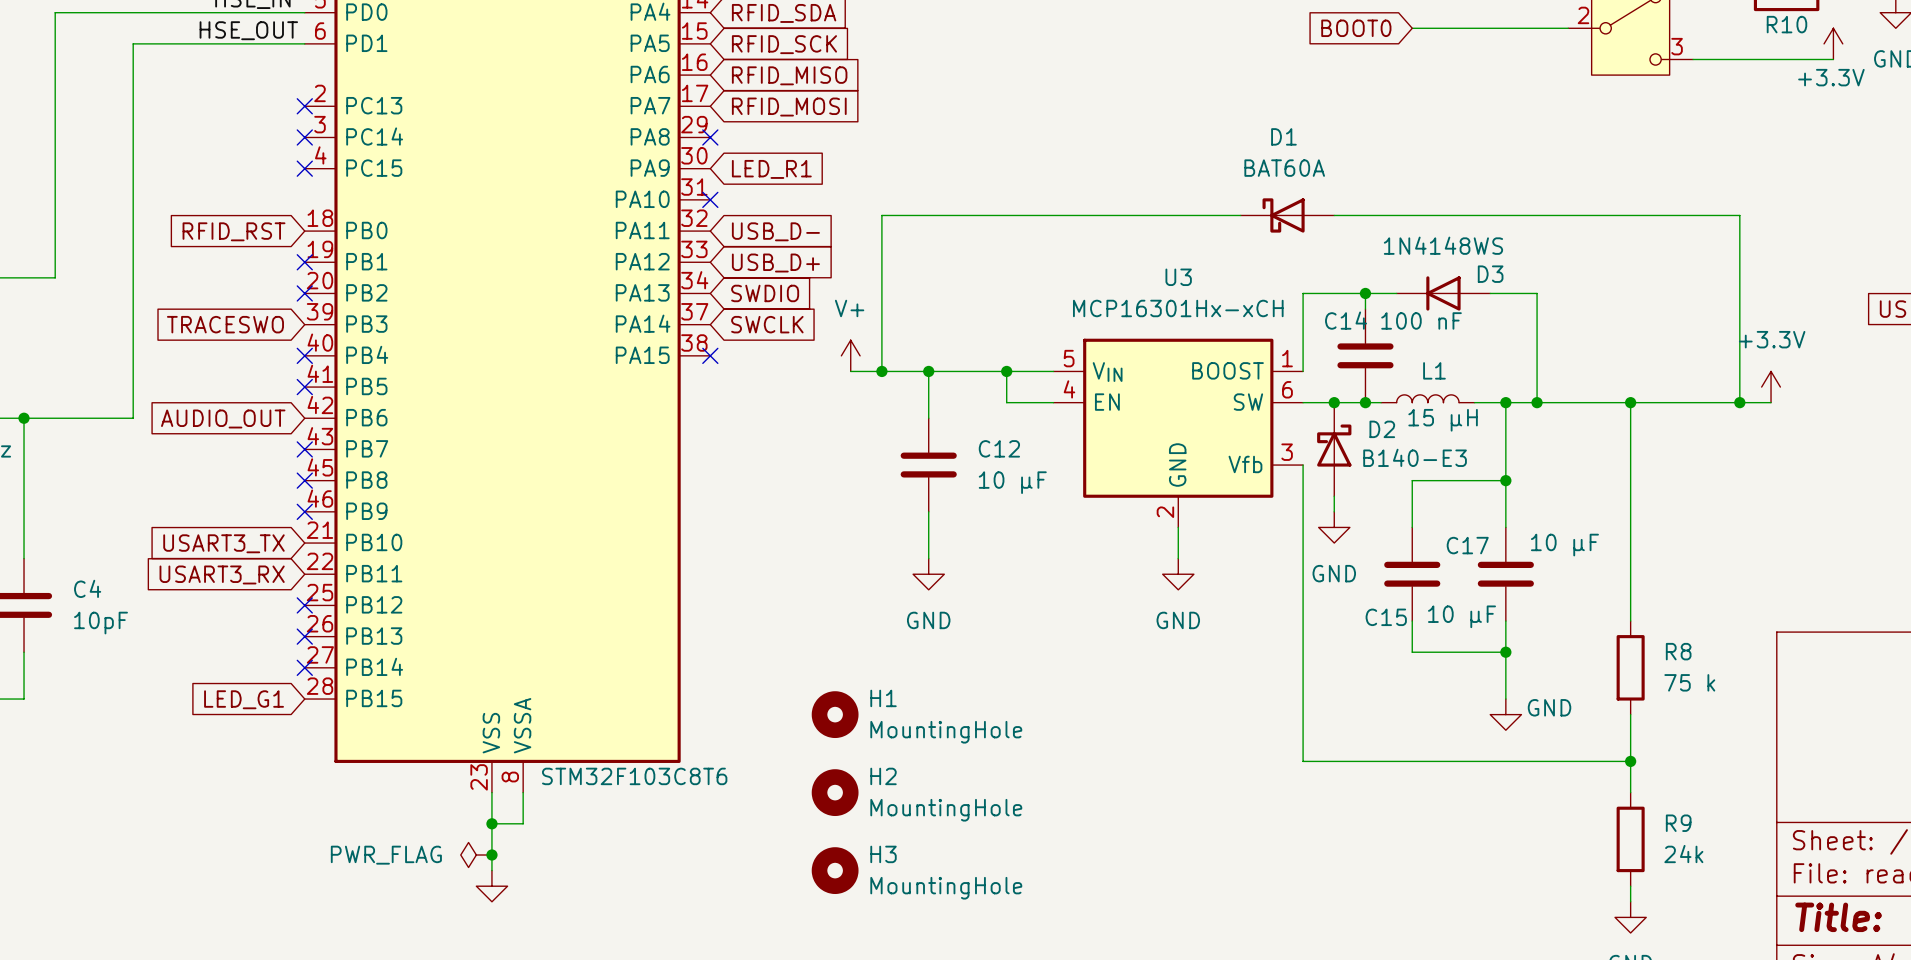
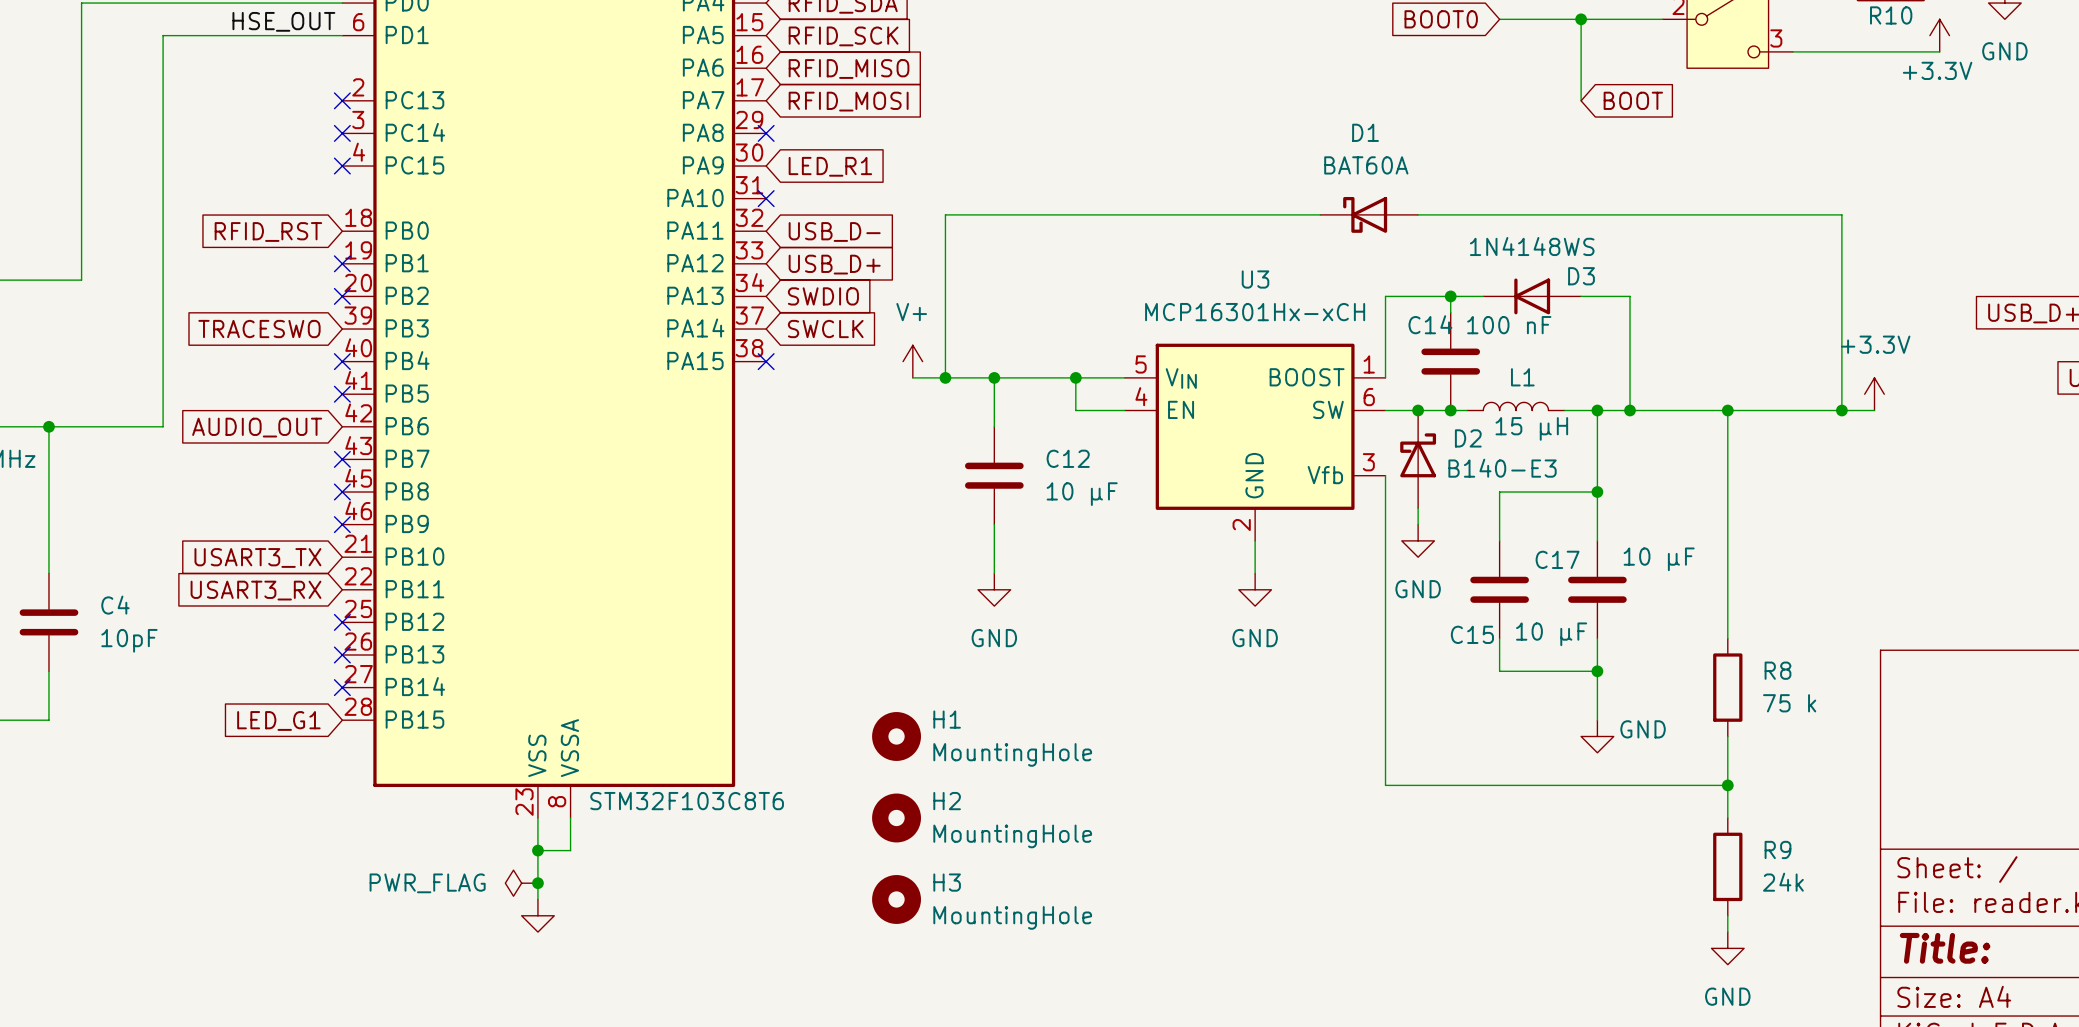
wire: none -> (1581, 19) (1581, 100)
junction: none -> (1581, 19)
global label: none -> BOOT (1633, 100)

